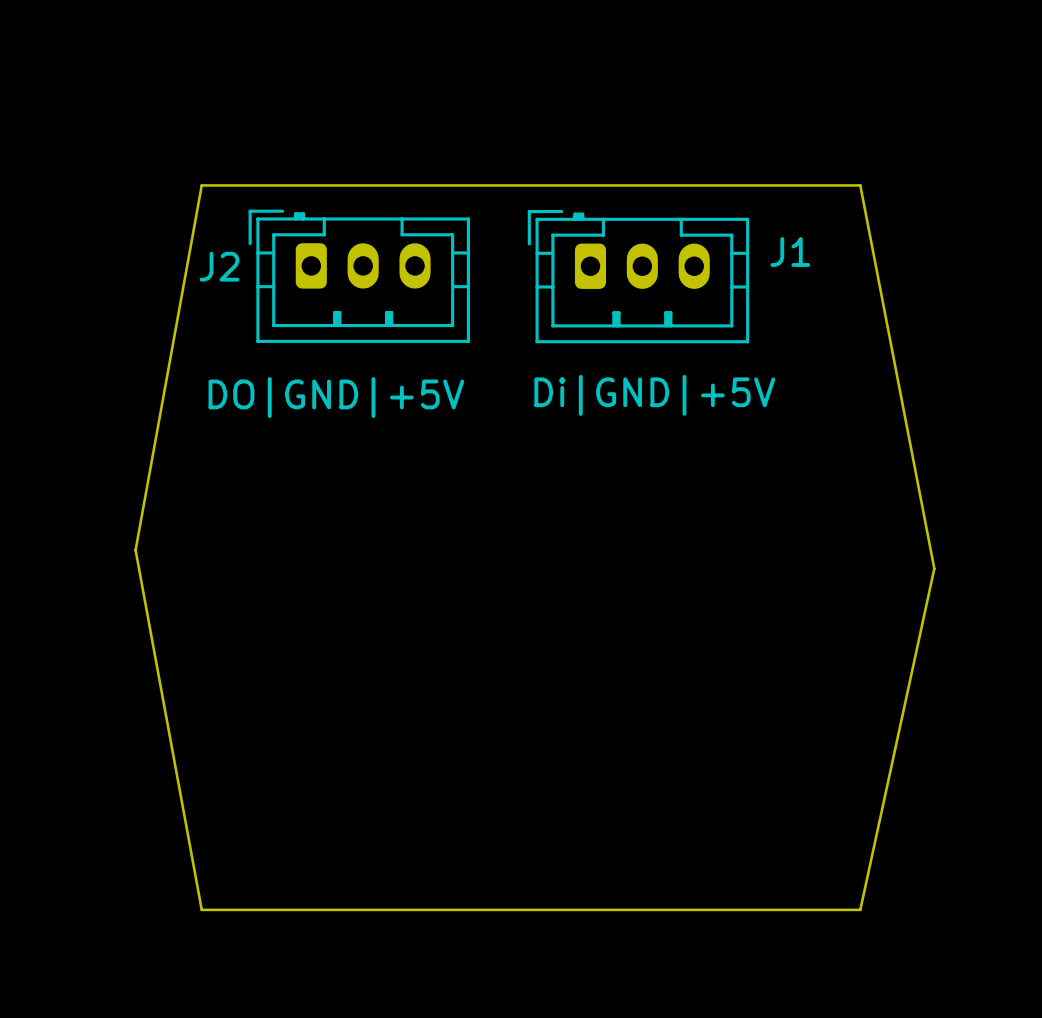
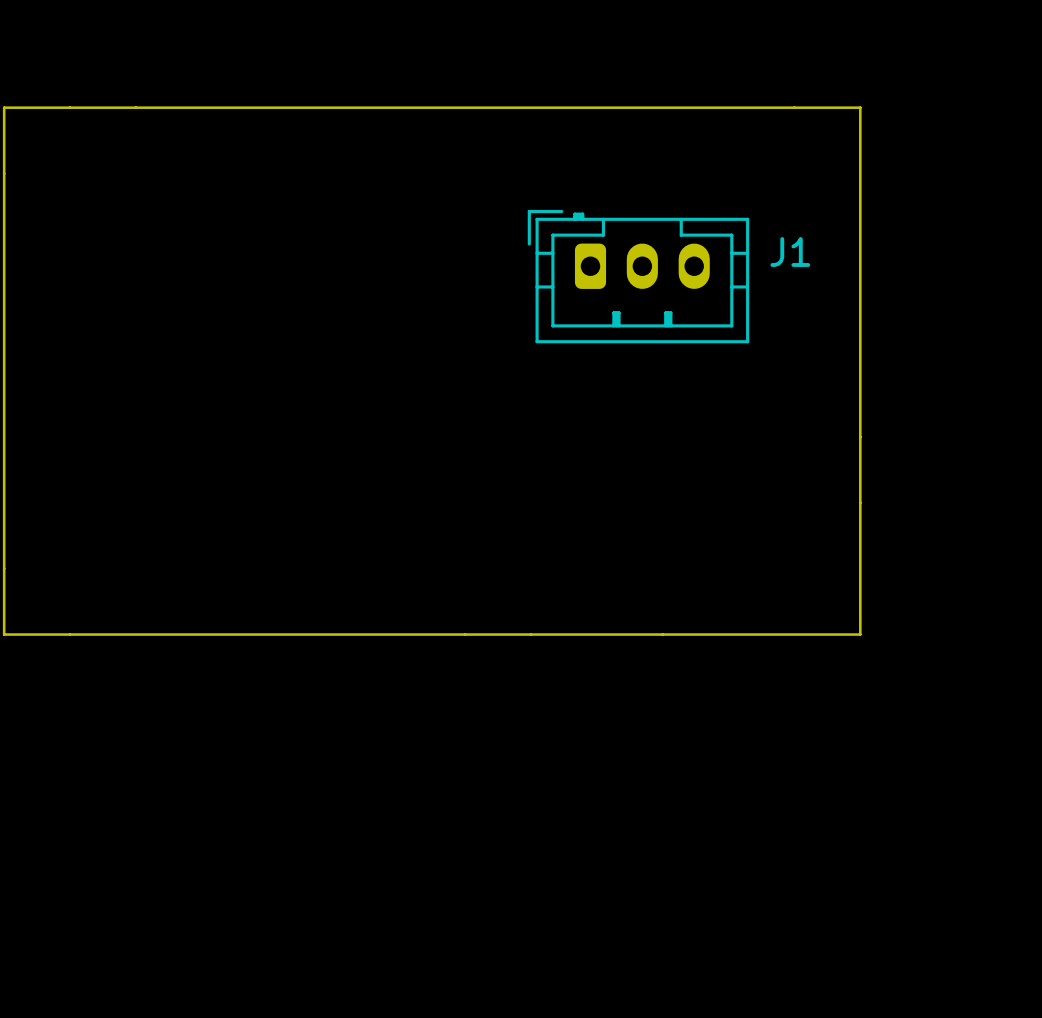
board edge: none -> (860, 107) (4, 107) (4, 634) (860, 634) (860, 107)
board edge: (860, 185) (201, 185) (135, 550) (201, 909) (860, 909) (934, 568) (860, 185) -> none
J2: (359, 276) -> none
text: Di|GND|+5V (654, 395) -> none
text: DO|GND|+5V (336, 397) -> none

